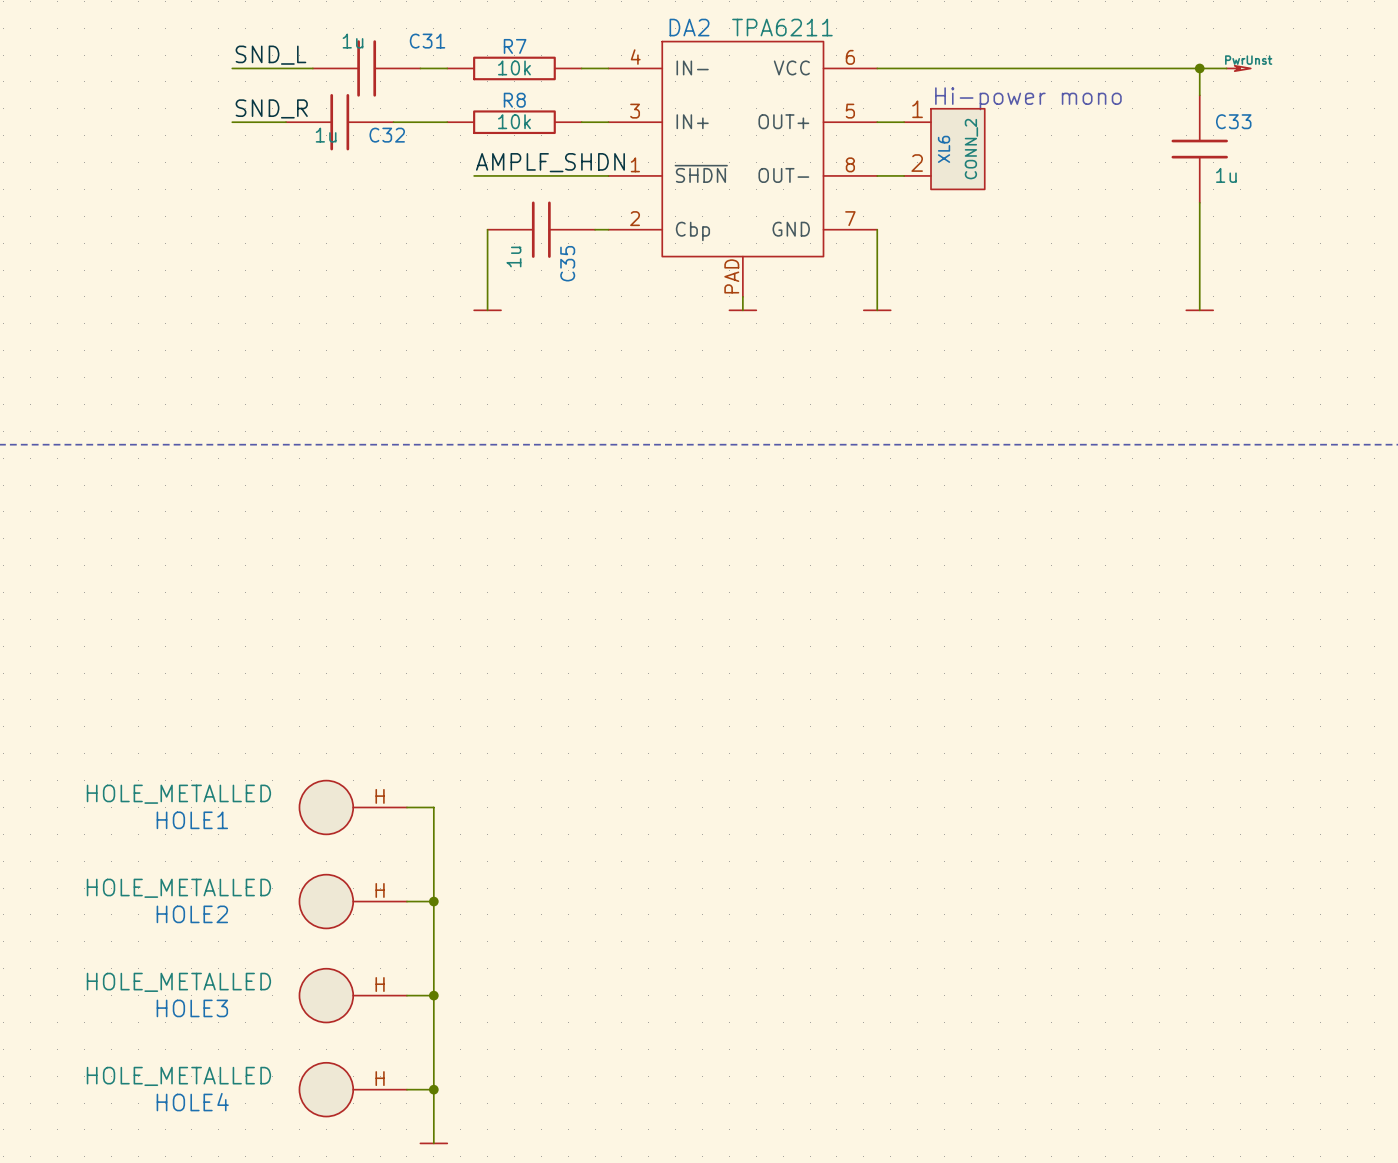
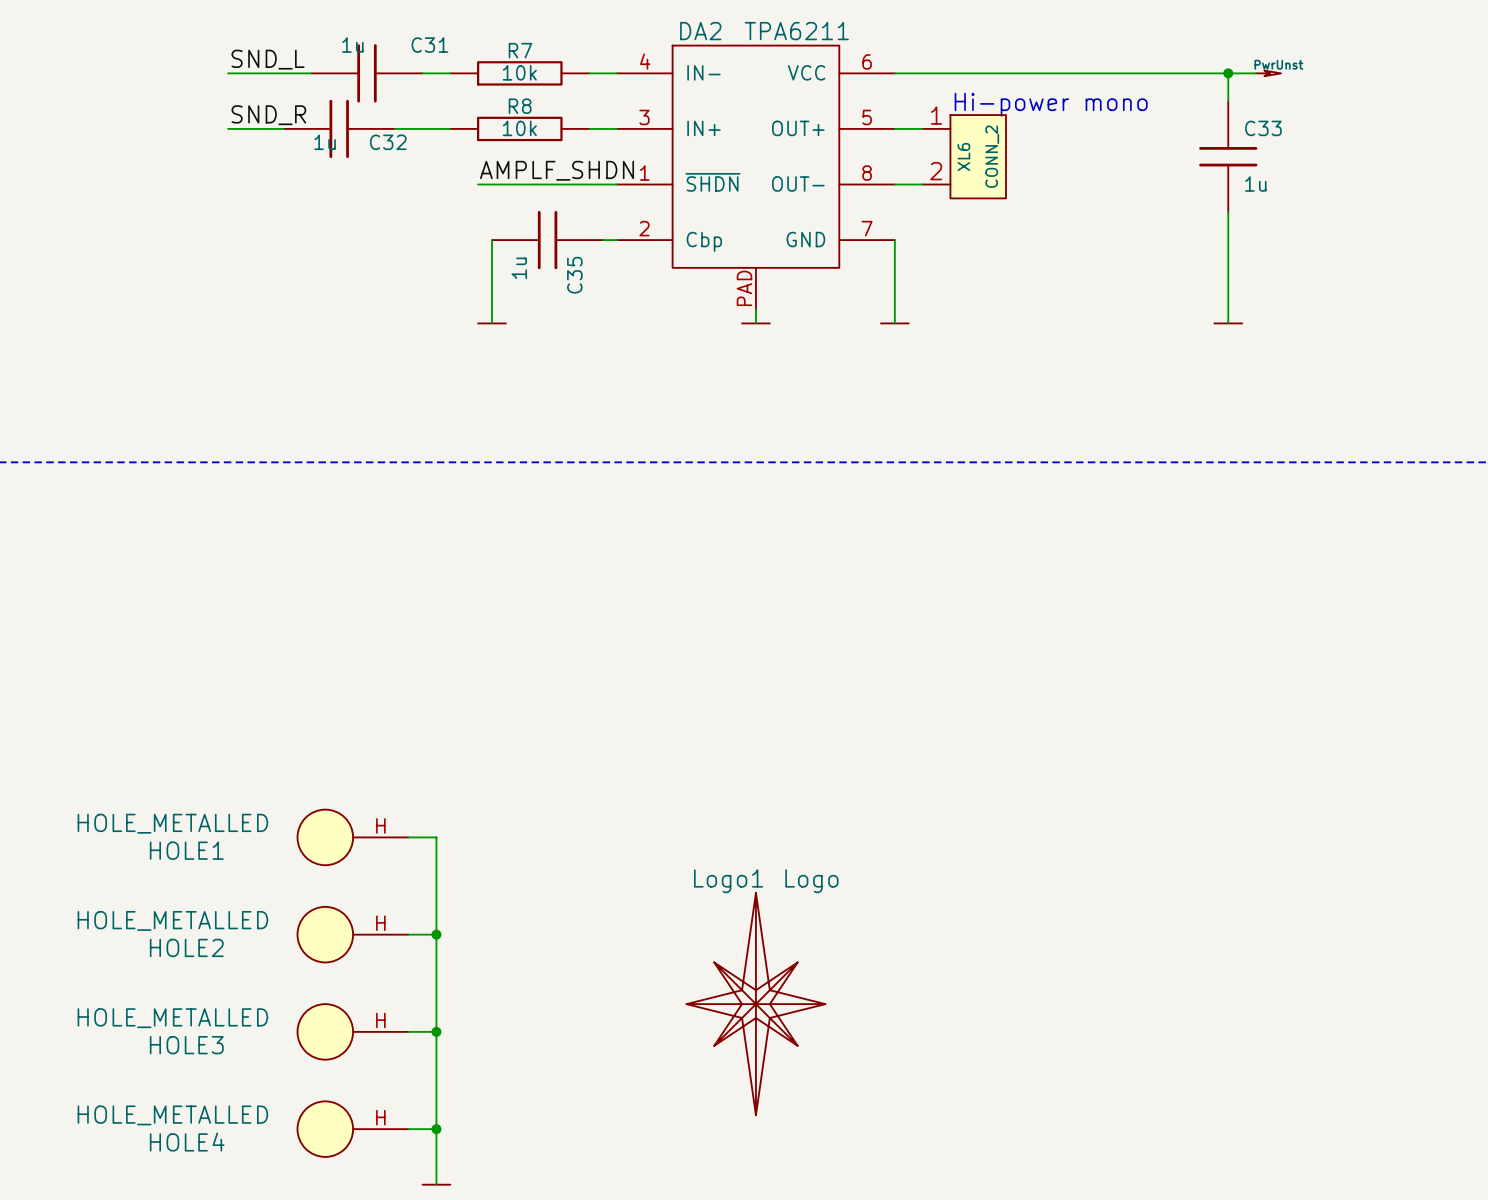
Logo1: none -> Logo (755, 1004)

